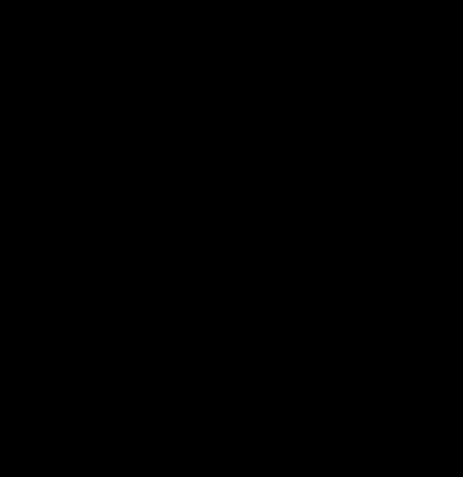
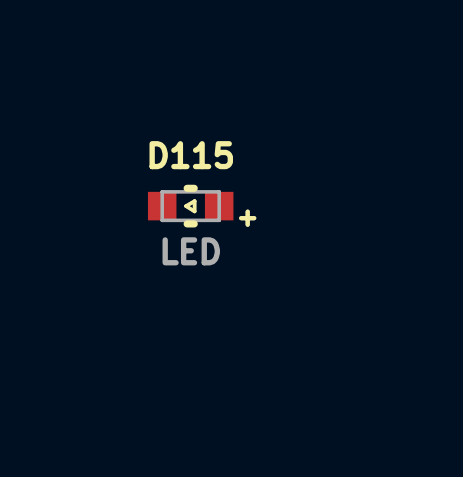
D115: none -> LED (190, 206)

